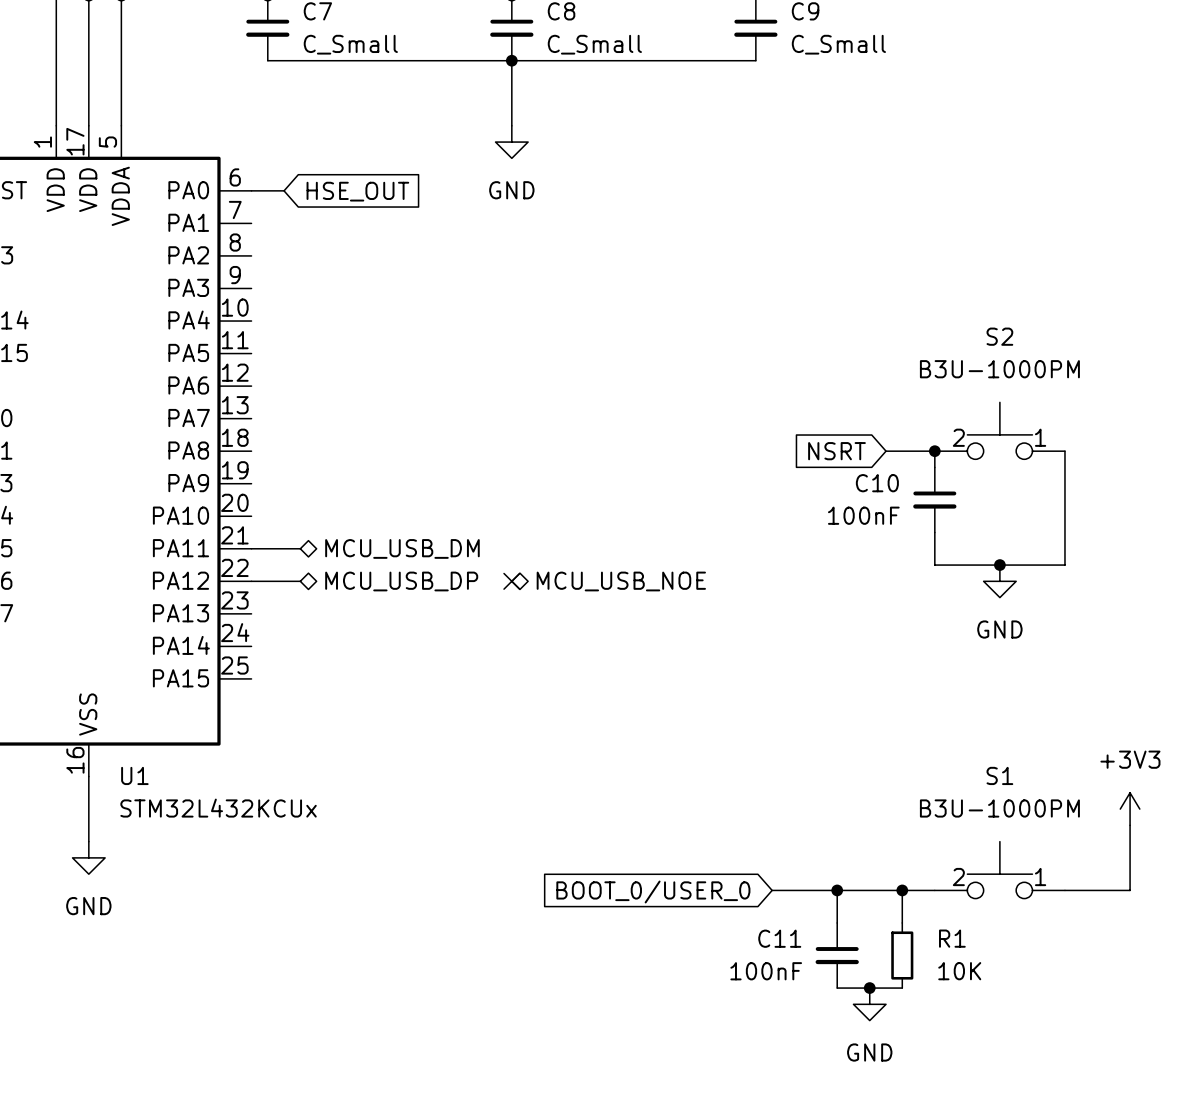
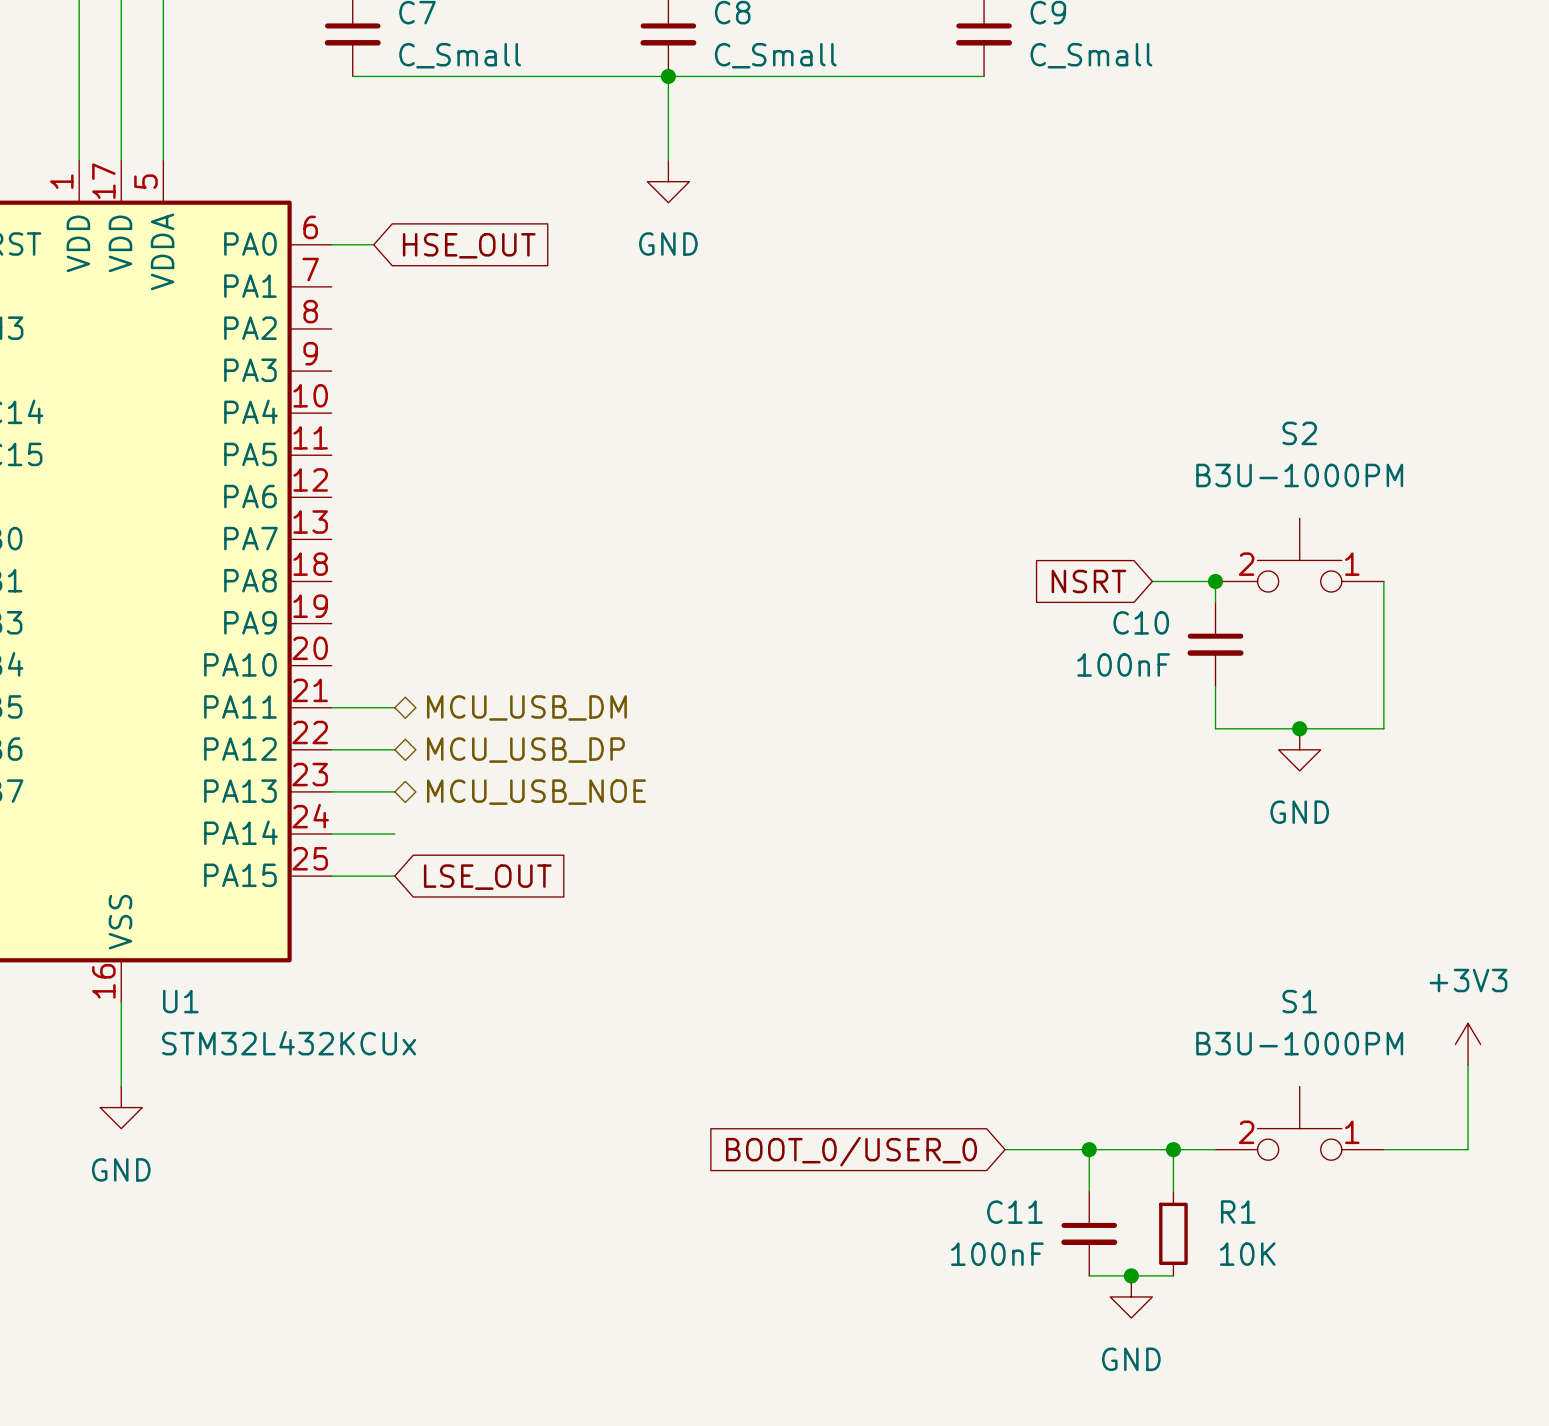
no-connect mark: (511, 581) -> none
hierarchical label position: MCU_USB_NOE (621, 581) -> MCU_USB_NOE (536, 792)
wire: none -> (331, 791) (394, 791)
wire: none -> (331, 834) (394, 834)
wire: none -> (331, 876) (394, 876)
global label: none -> LSE_OUT (487, 877)

